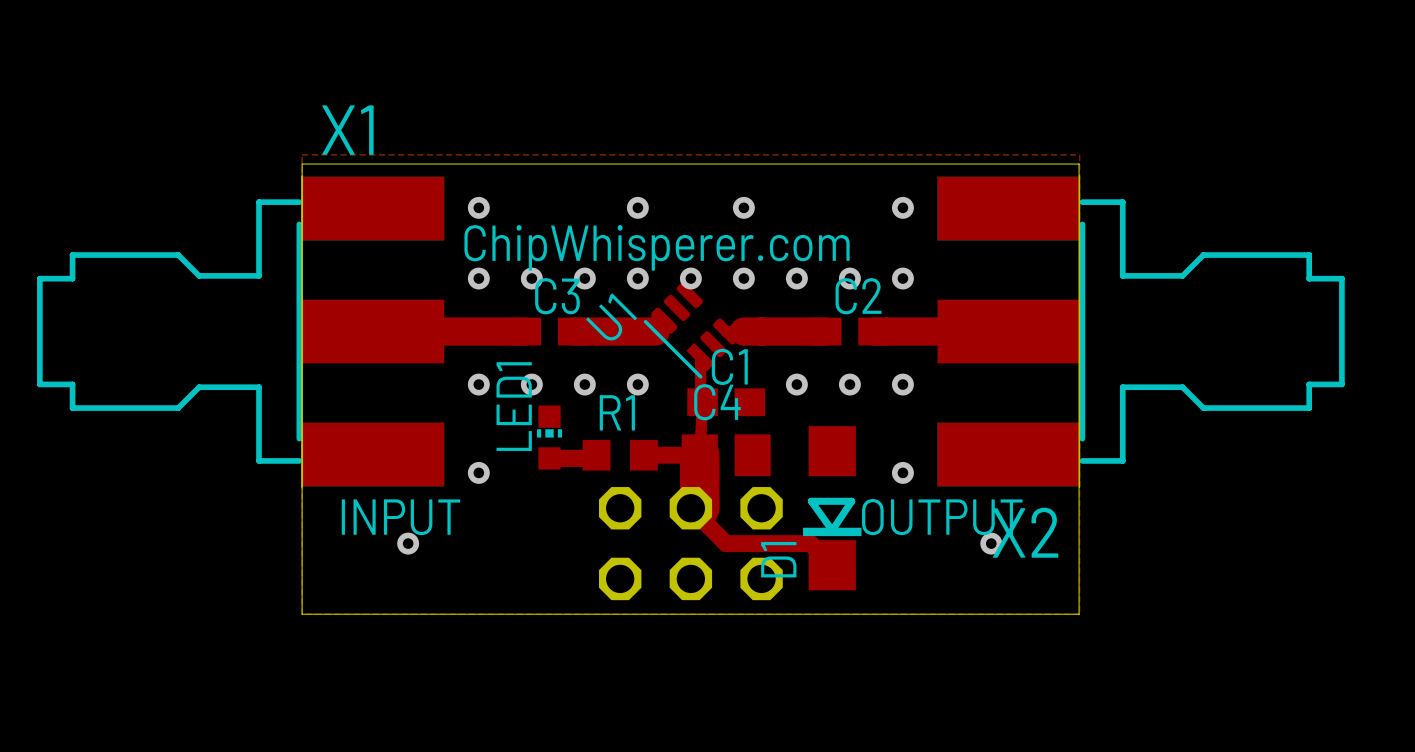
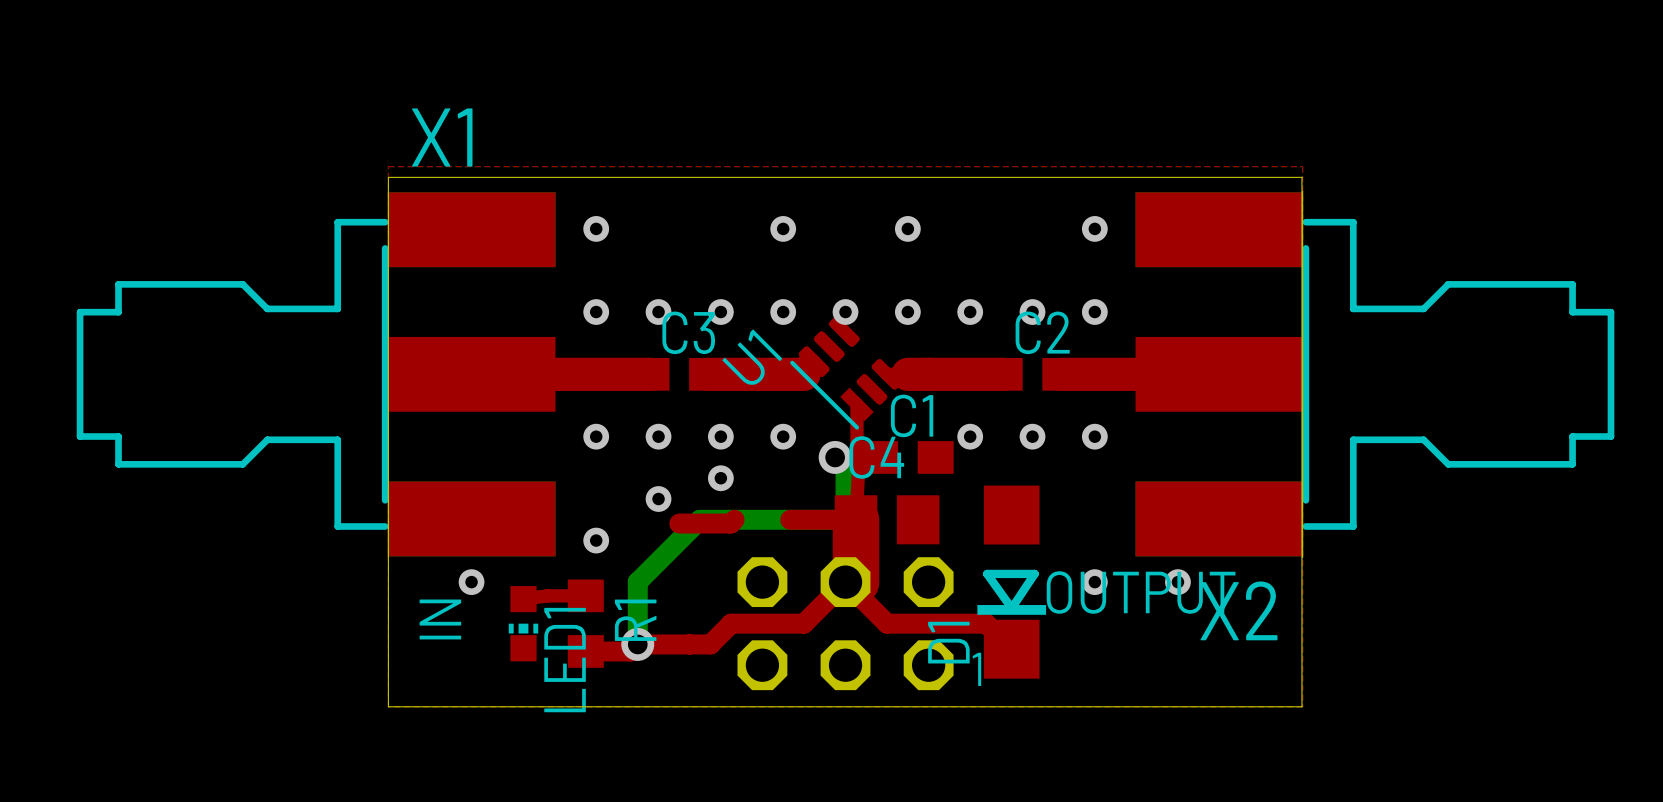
text: ChipWhisperer.com (657, 247) -> none
bottom track: none -> (835, 457) (845, 467) (845, 519) (700, 519) (637, 582) (637, 644)
via: none -> (835, 457)
C1 position: (726, 402) -> (907, 457)
via: none -> (720, 478)
via: none -> (658, 499)
LED1 rotation: 0° (549, 437) -> 180° (523, 623)
LED1 position: (549, 437) -> (523, 623)
R1 rotation: 0° (620, 455) -> 90° clockwise (585, 623)
R1 position: (620, 455) -> (585, 623)
via position: (902, 472) -> (1094, 582)
top track: none -> (845, 582) (803, 623) (731, 623) (710, 644) (637, 644) (630, 651) (585, 651)
via: none -> (1177, 582)
text: INPUT (400, 517) -> none
top track: none -> (585, 595) (547, 595) (523, 599)
text: none -> IN (440, 619)
via position: (408, 543) -> (471, 582)
via: (991, 543) -> none
via: none -> (637, 644)
text: none -> 1 (976, 669)

